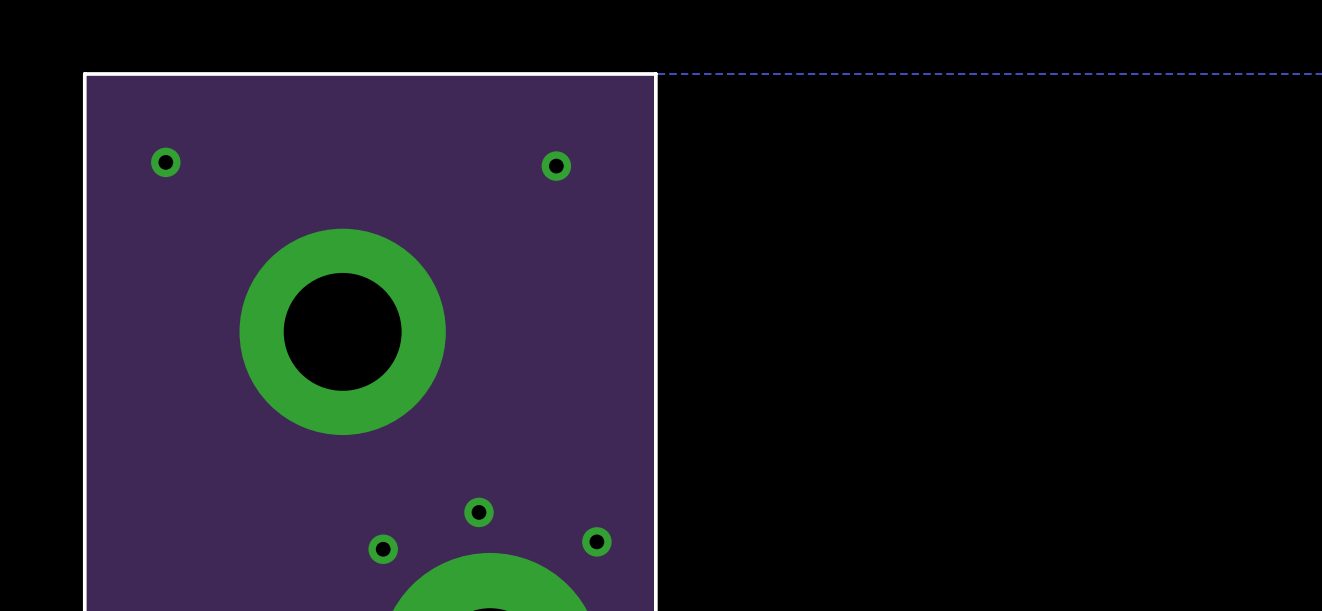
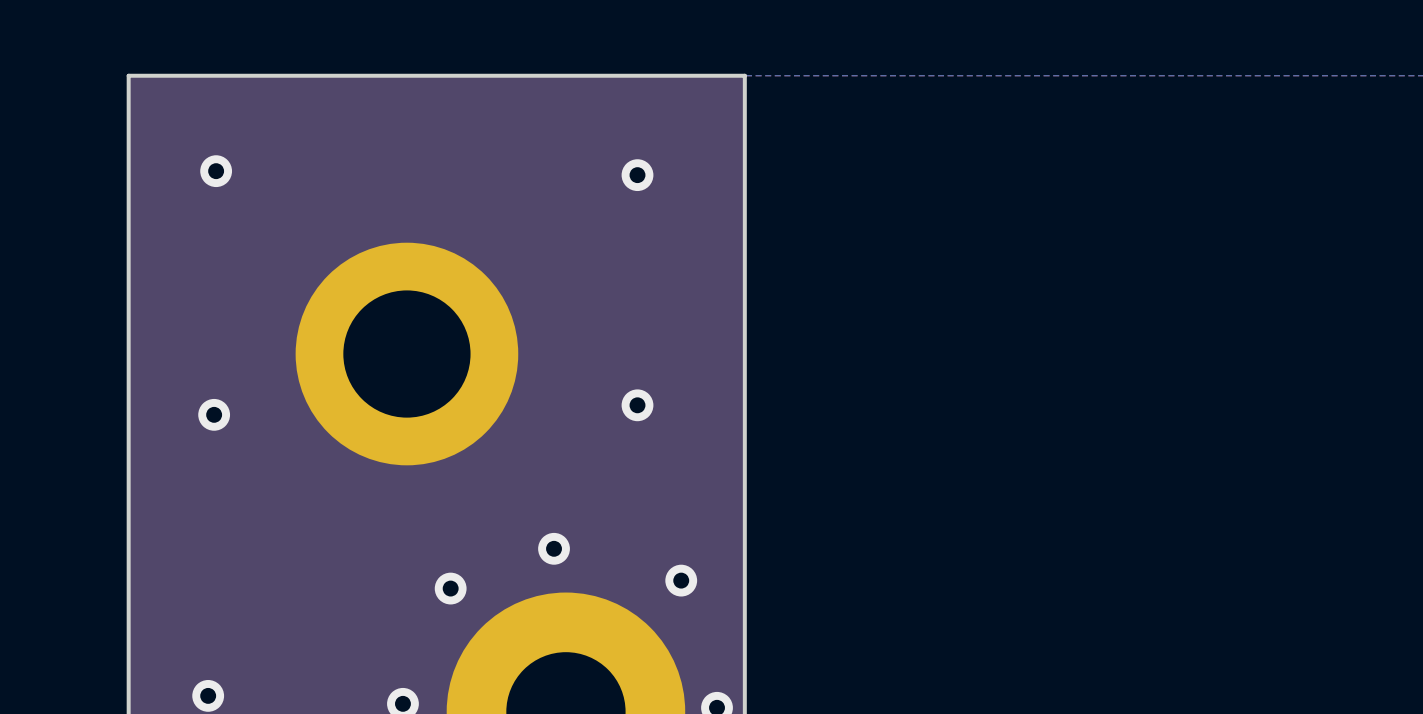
via: none -> (637, 405)
via: none -> (214, 414)

